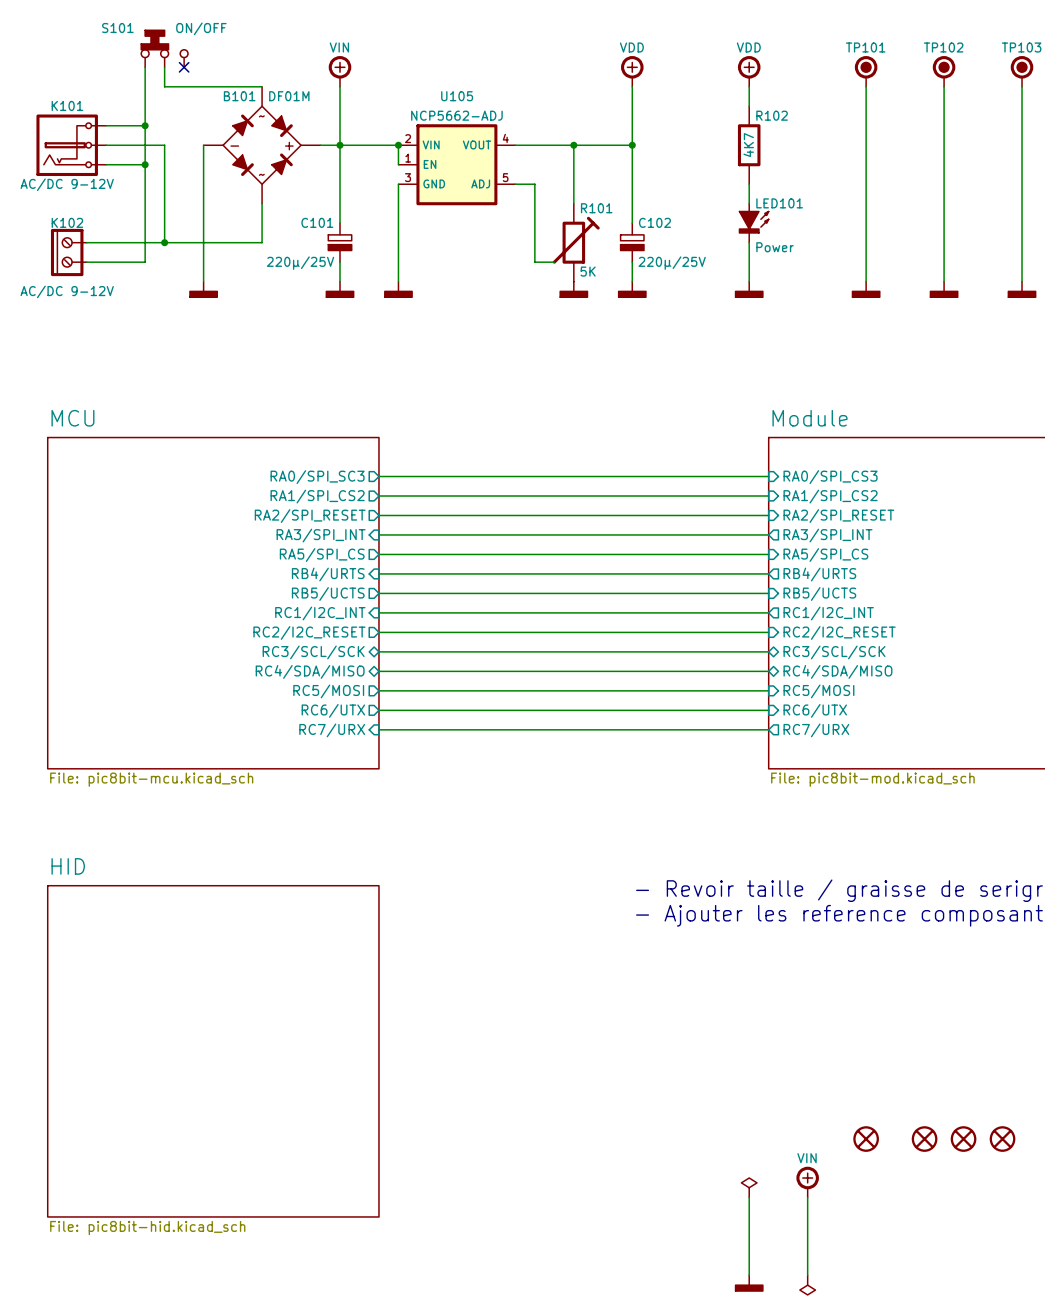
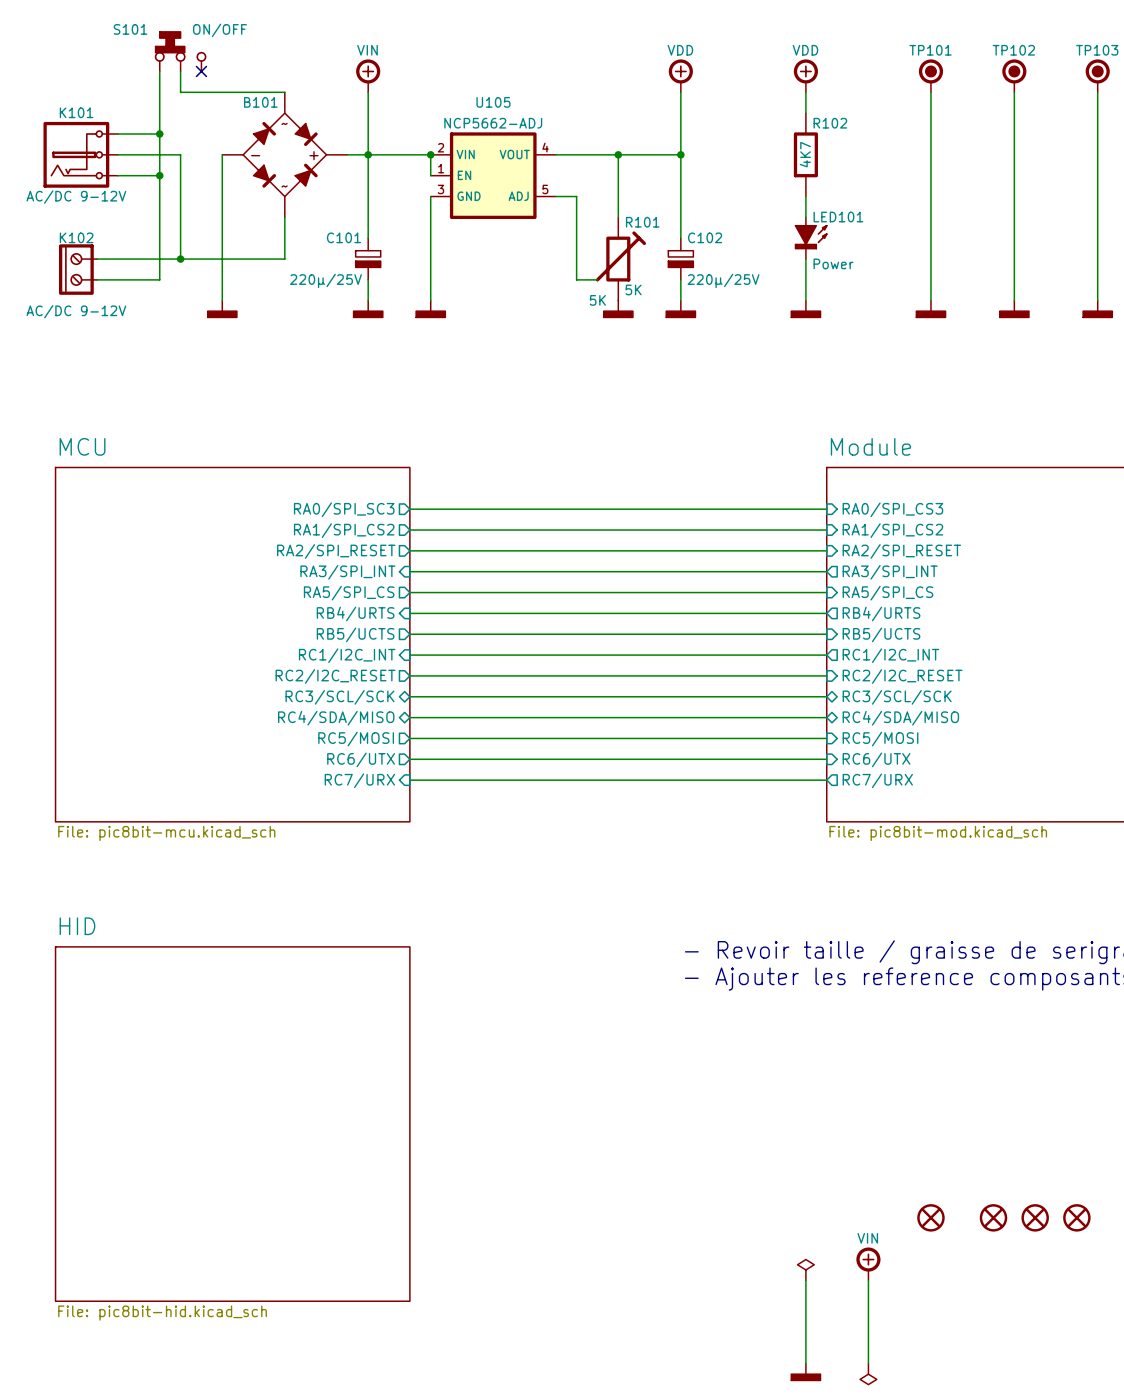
B101 value: DF01M (289, 96) -> none
R101 text: none -> 5K (597, 300)

